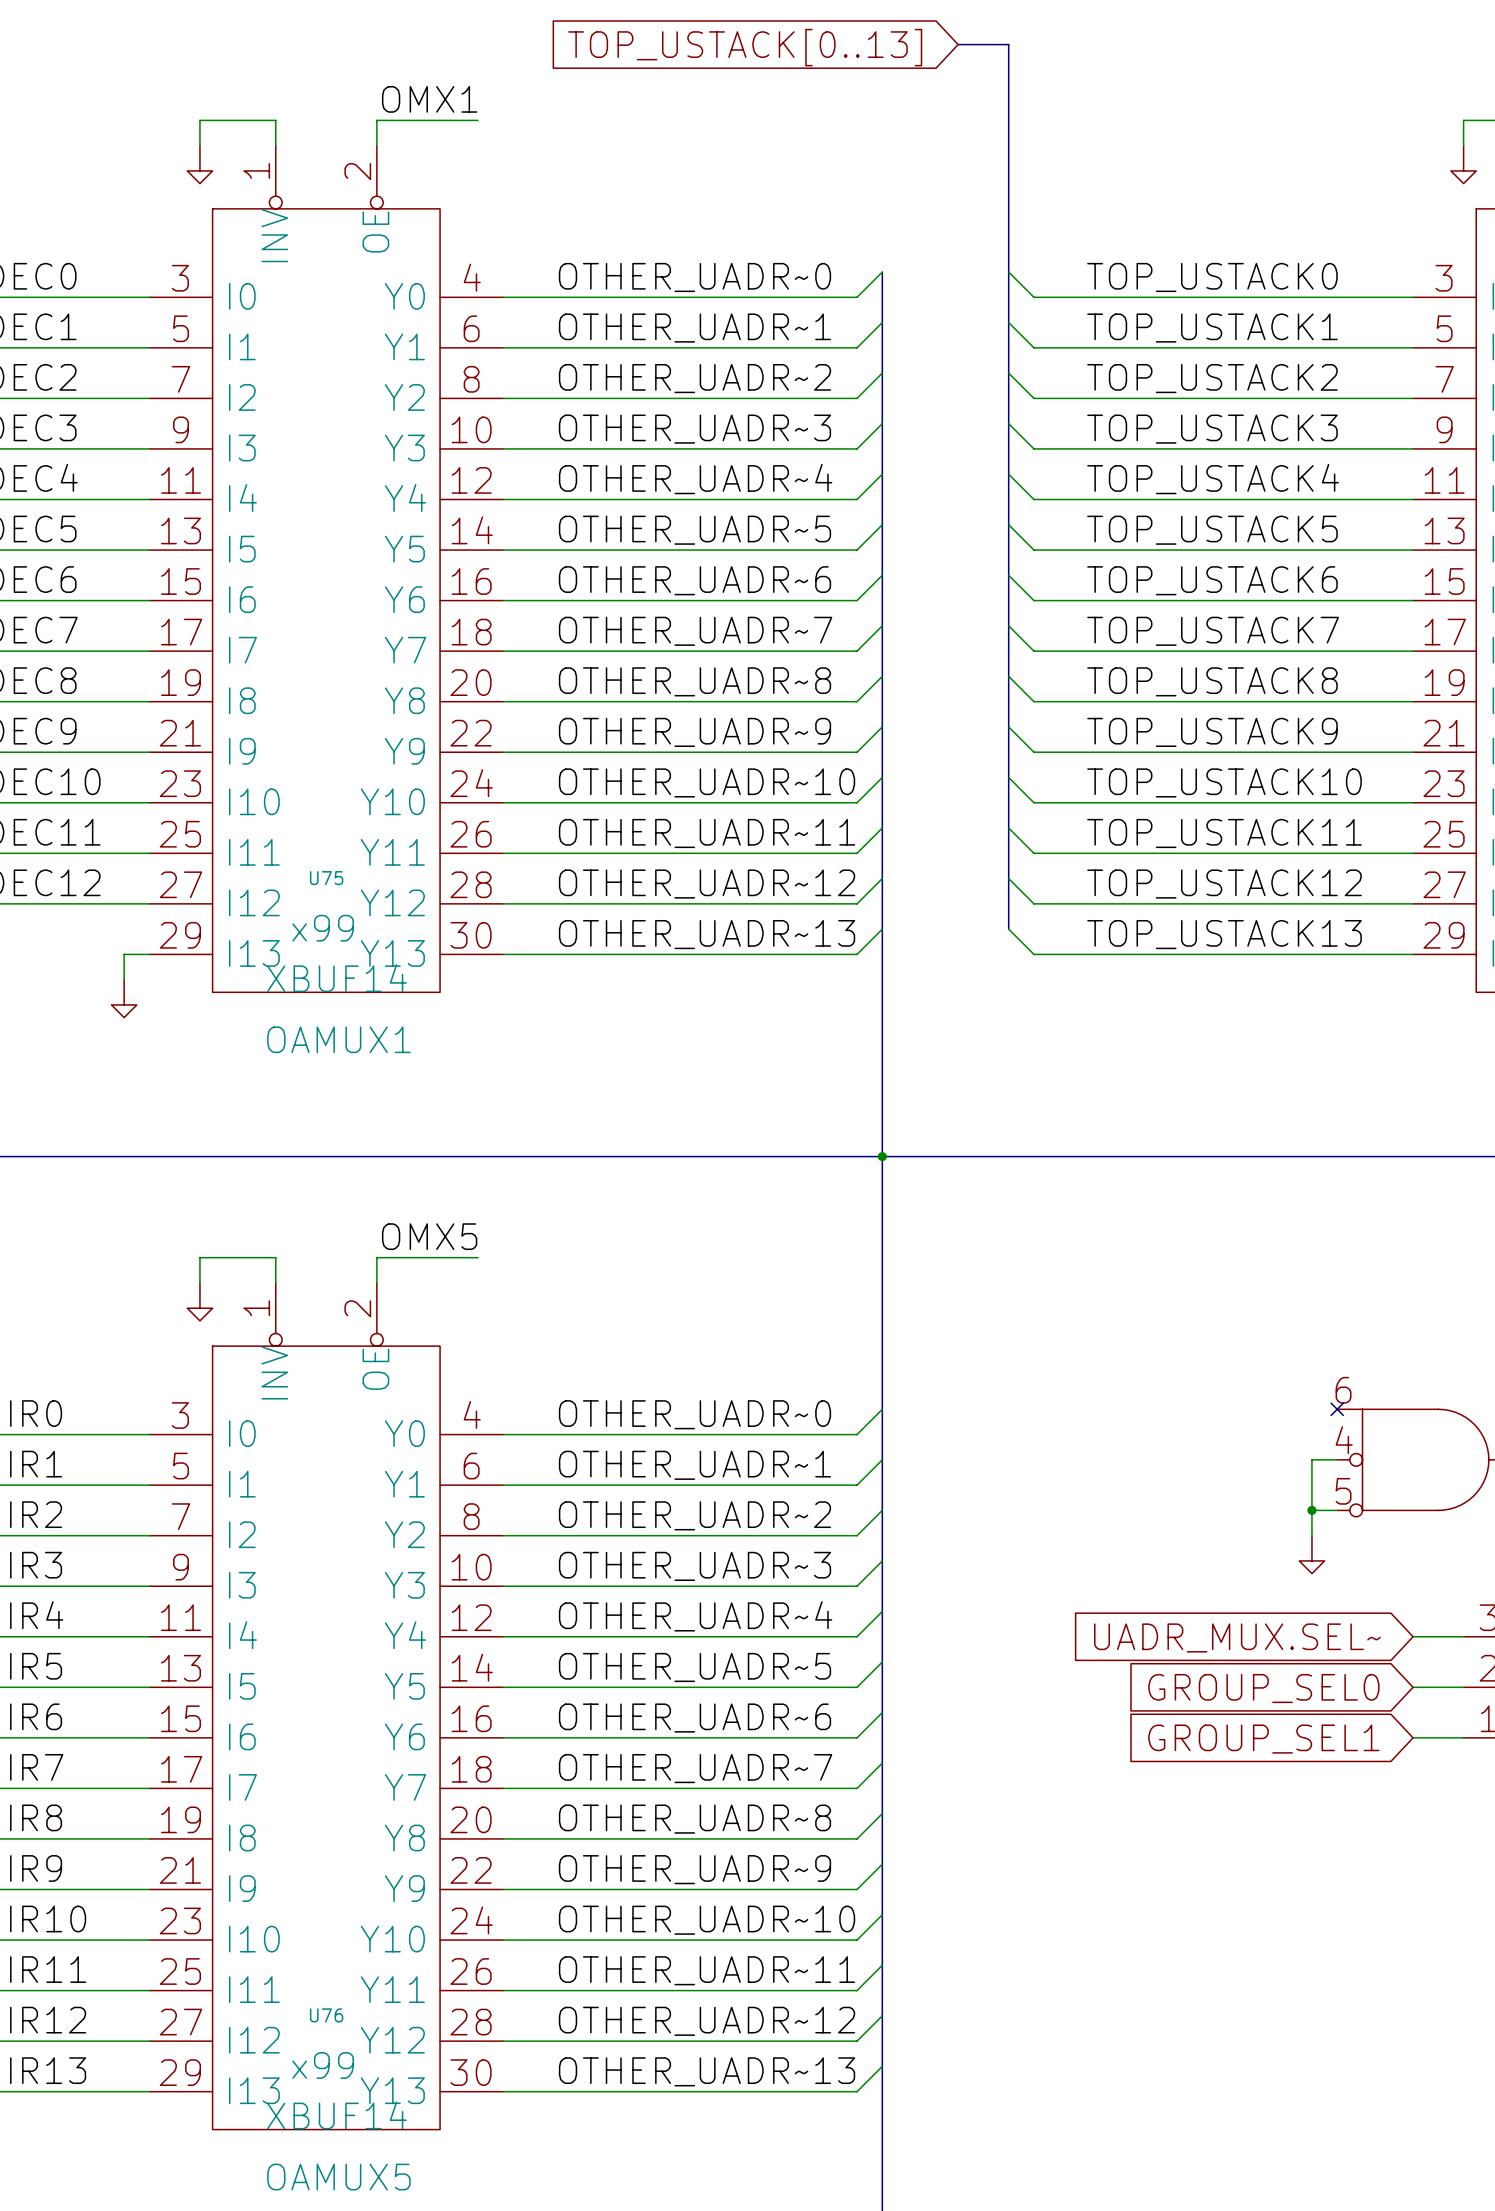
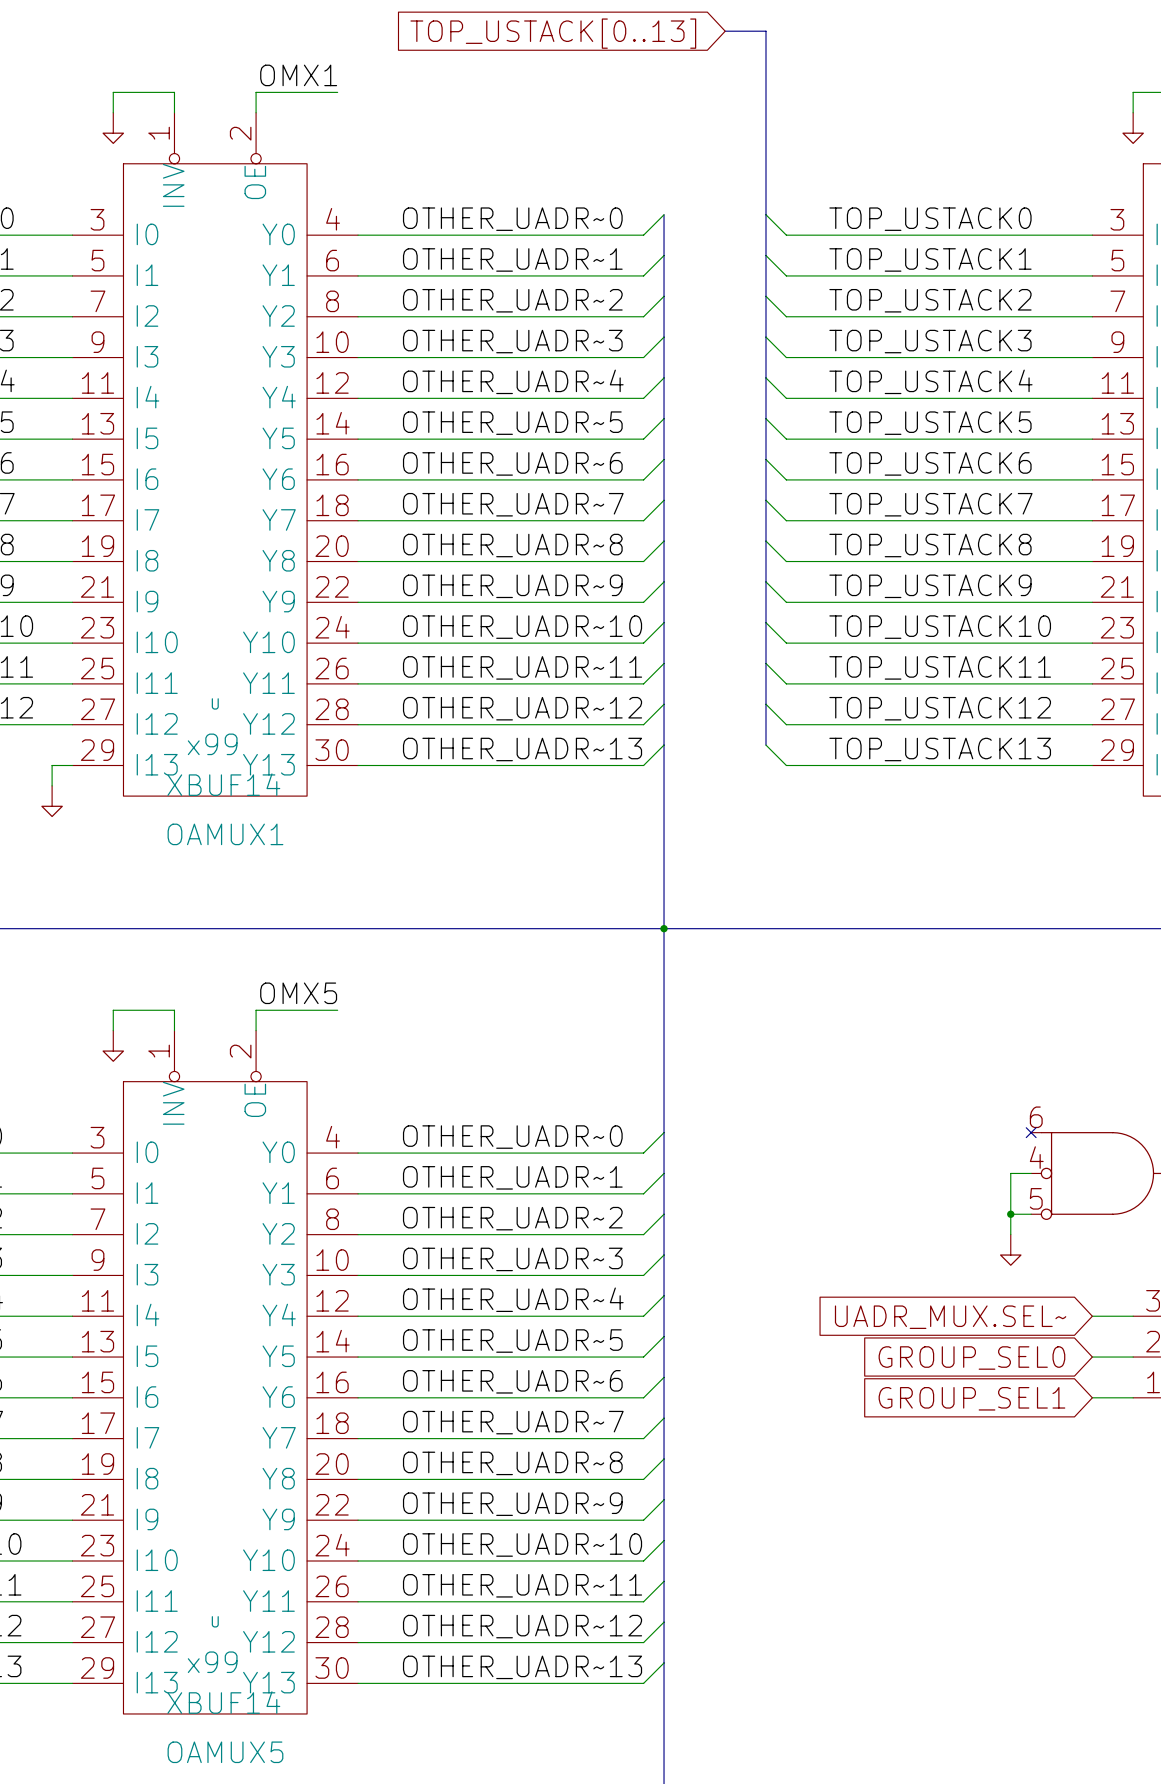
U75 name: U75 (326, 878) -> U (215, 703)
U76 name: U76 (326, 2015) -> U (215, 1621)

